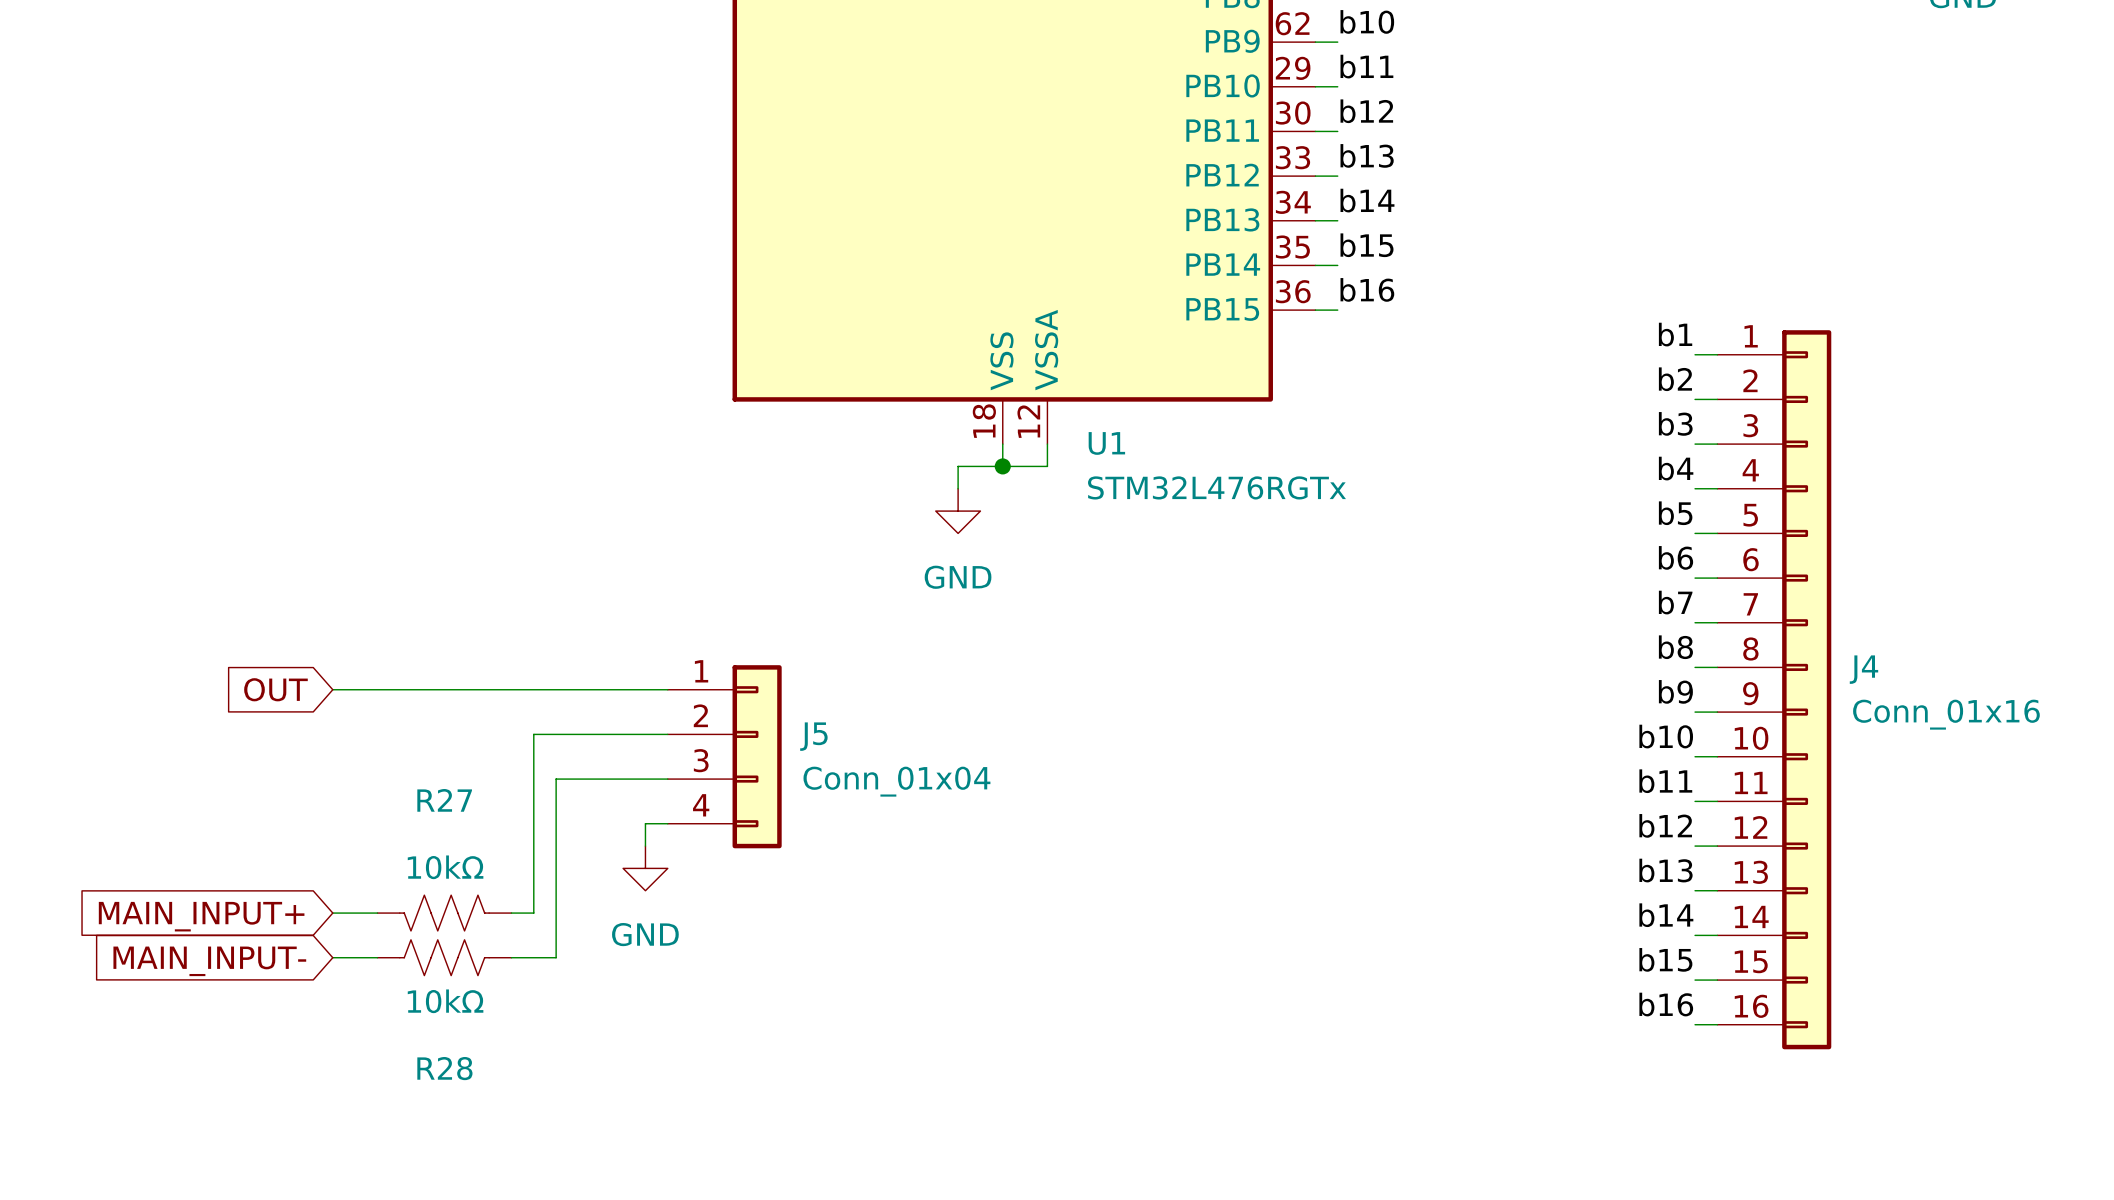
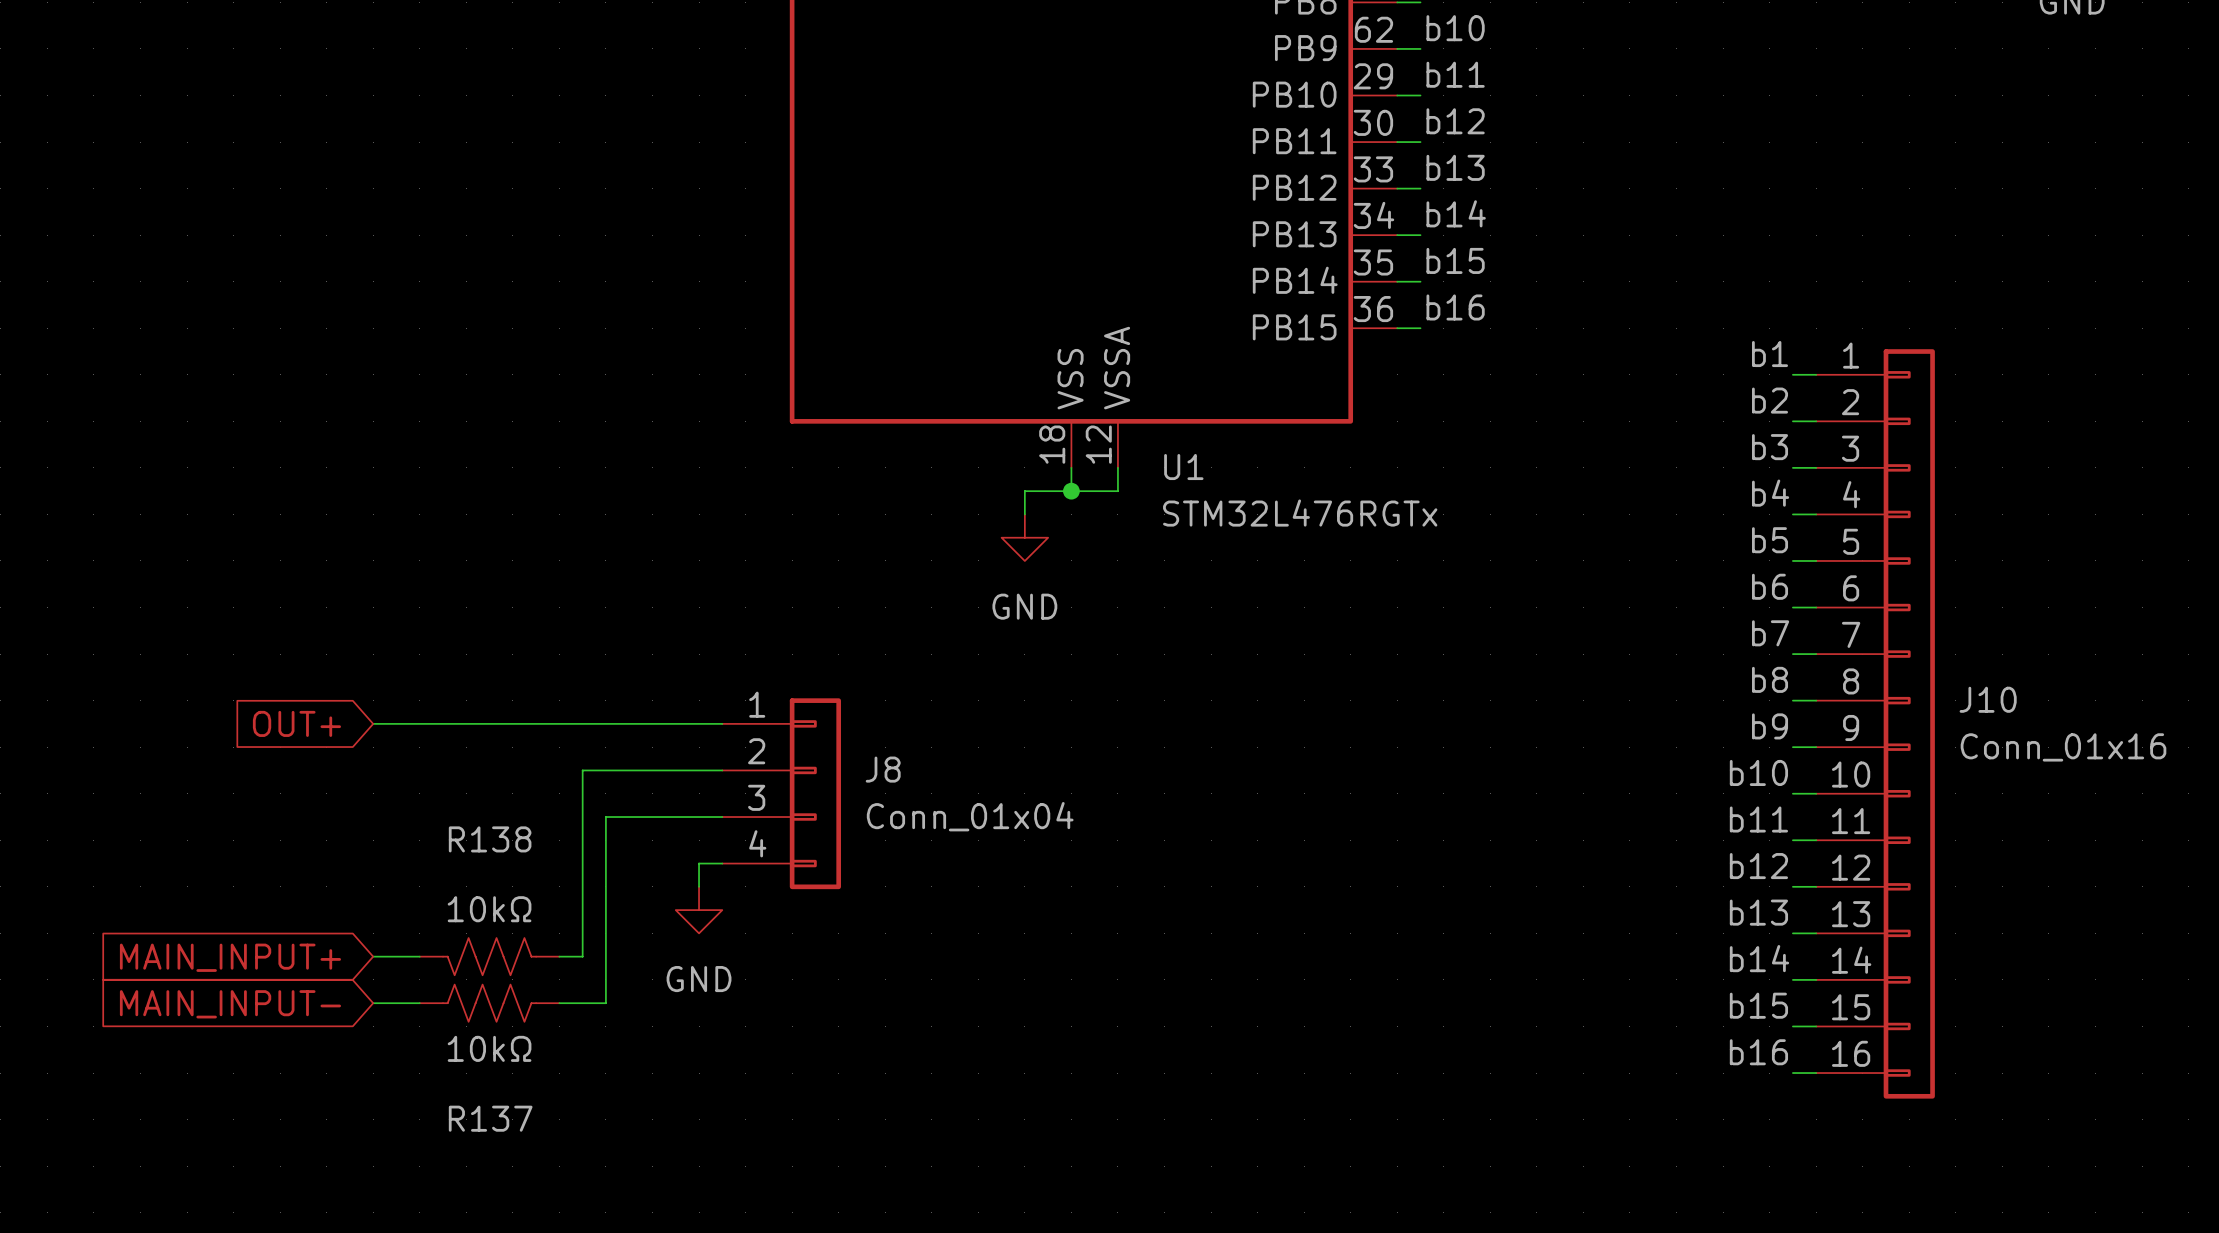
J4 name: J4 (1863, 669) -> J10 (1988, 699)
global label: OUT (275, 689) -> OUT+ (296, 723)
J5 name: J5 (813, 736) -> J8 (883, 769)
R27 name: R27 (444, 800) -> R138 (490, 839)
R28 name: R28 (444, 1068) -> R137 (490, 1118)

